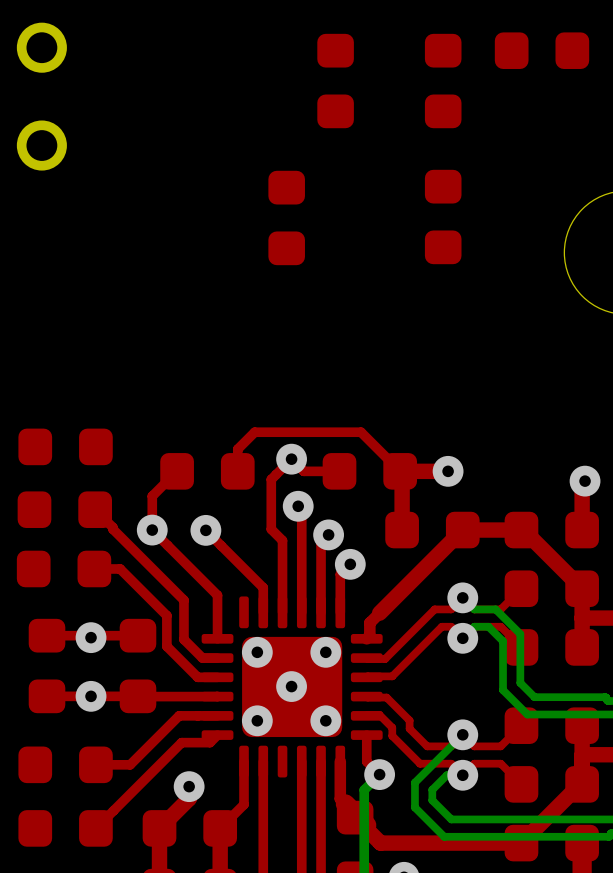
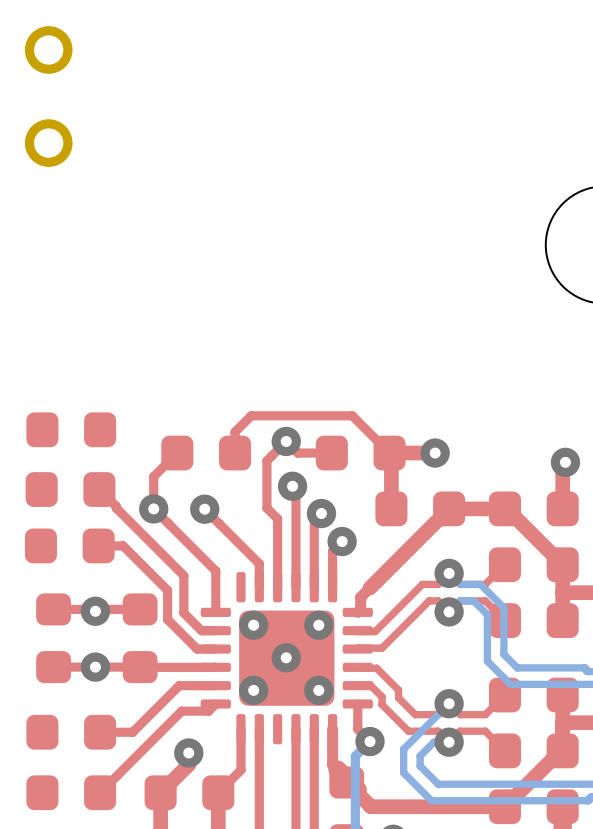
part: (542, 50) -> none
part: (335, 81) -> none
part: (443, 81) -> none
part: (286, 217) -> none
part: (443, 217) -> none

